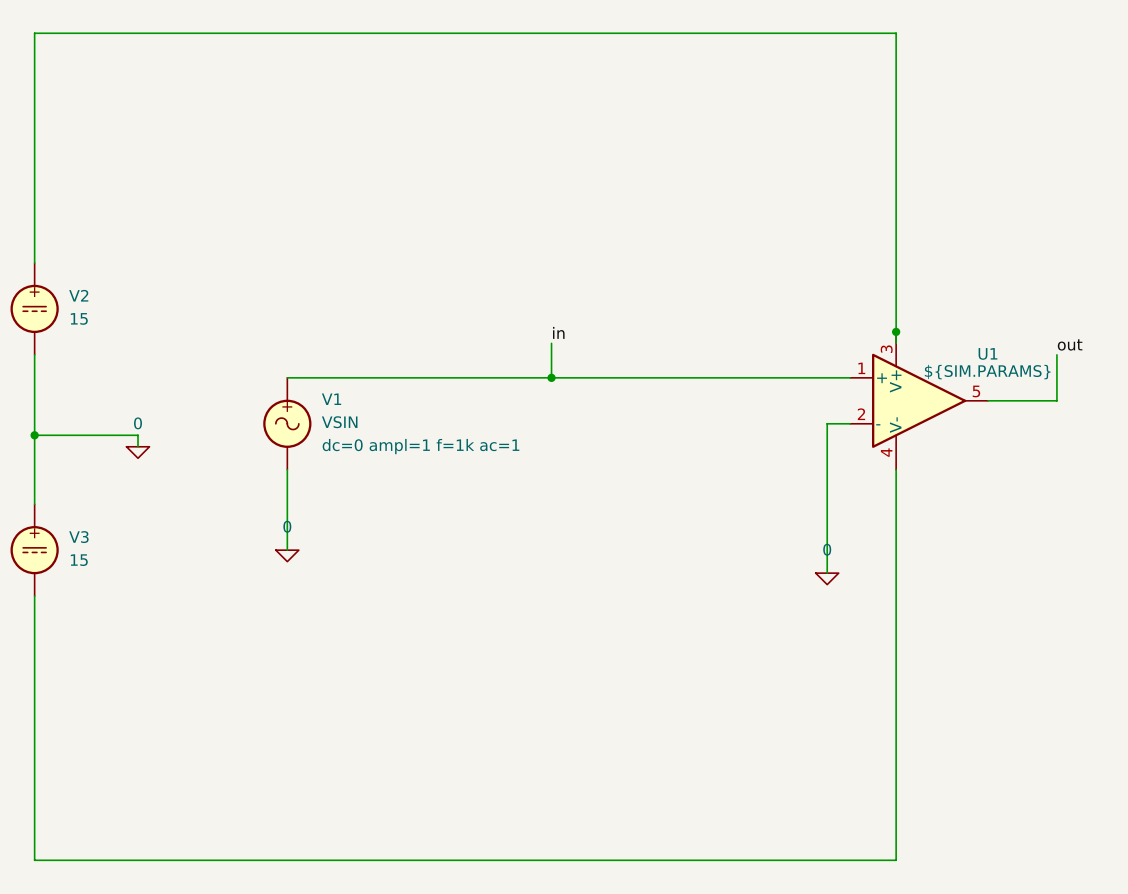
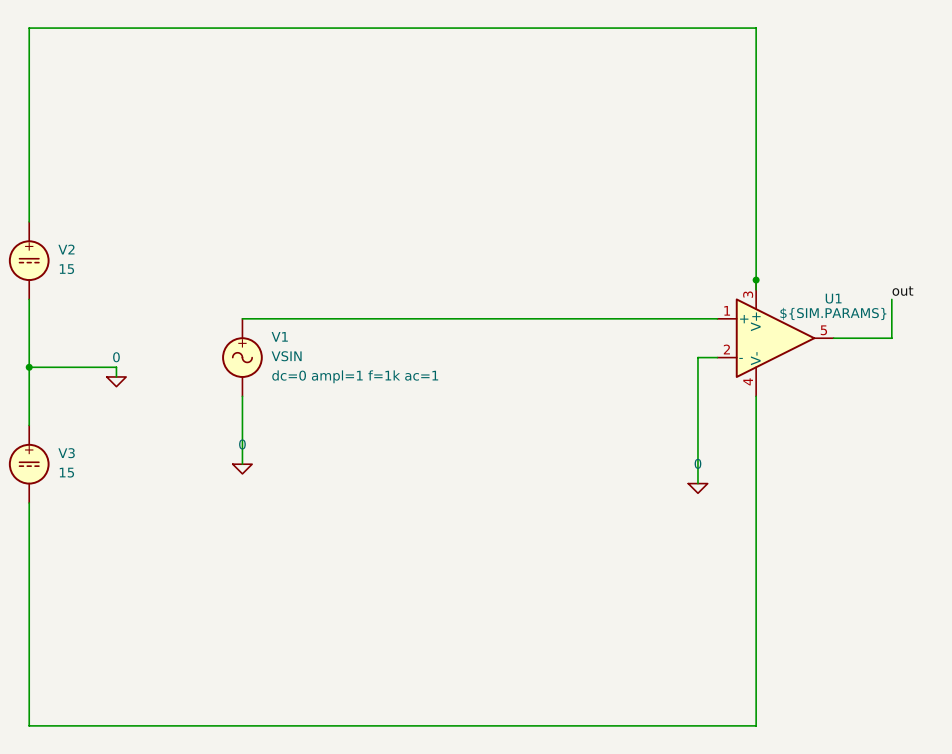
label: in (558, 332) -> none
wire: (551, 343) (551, 377) -> none
junction: (551, 377) -> none

